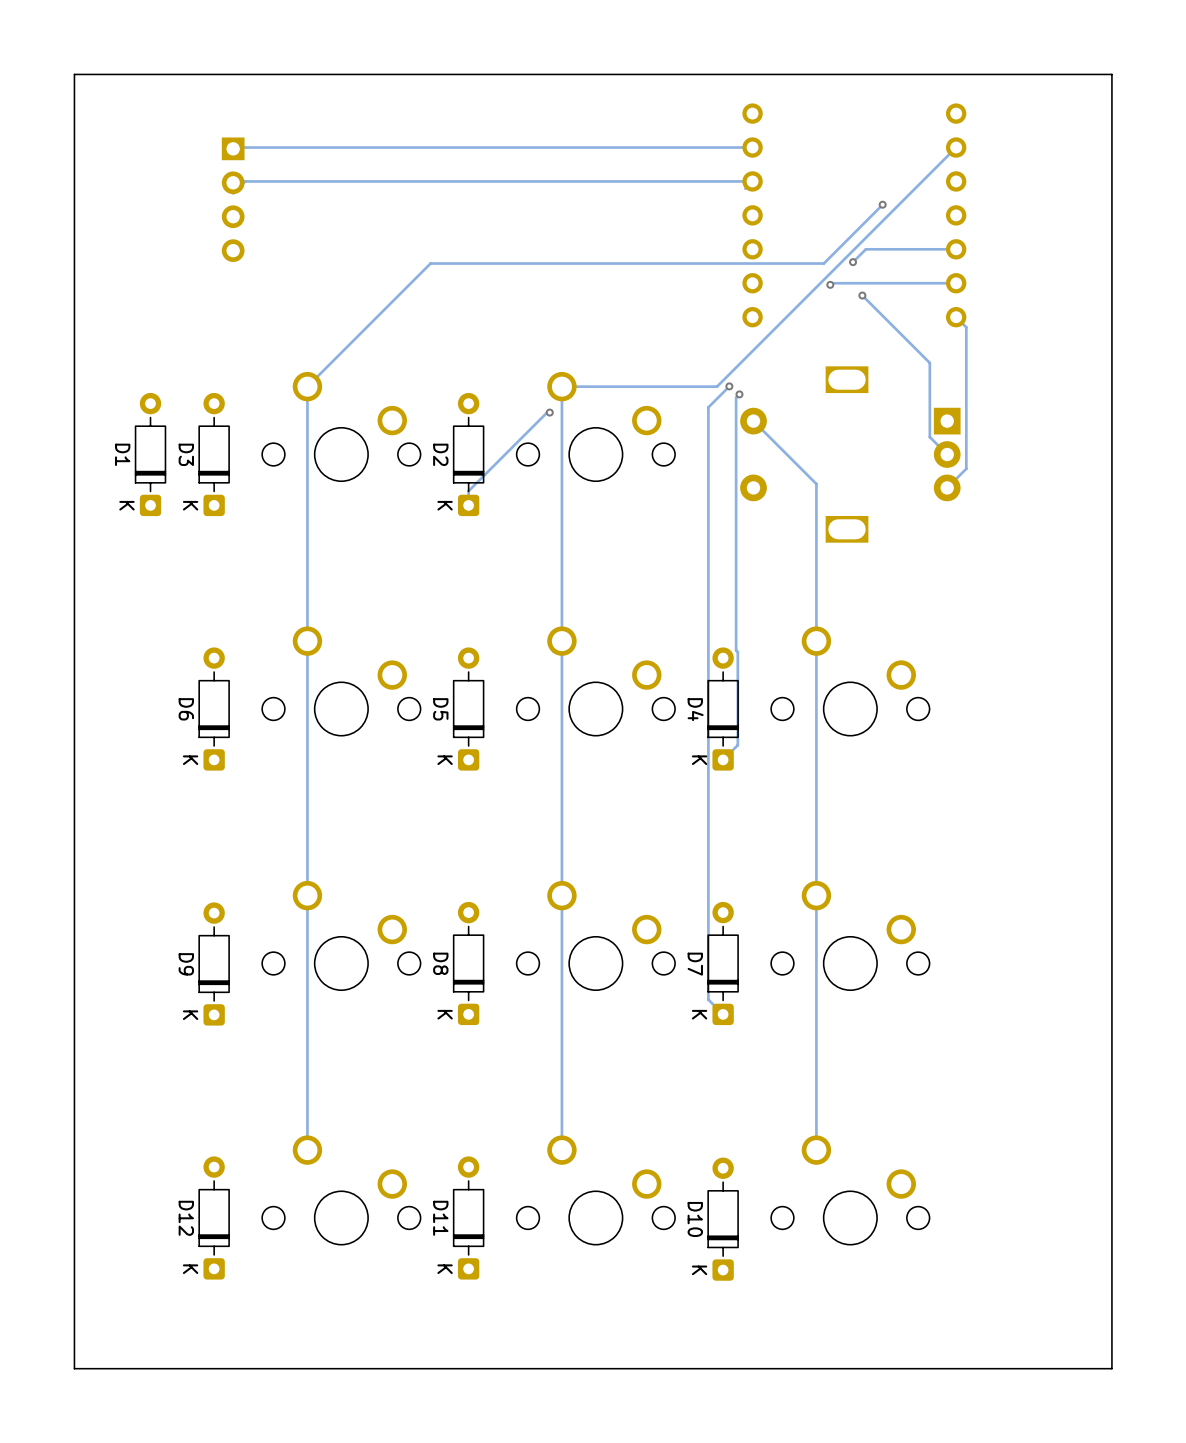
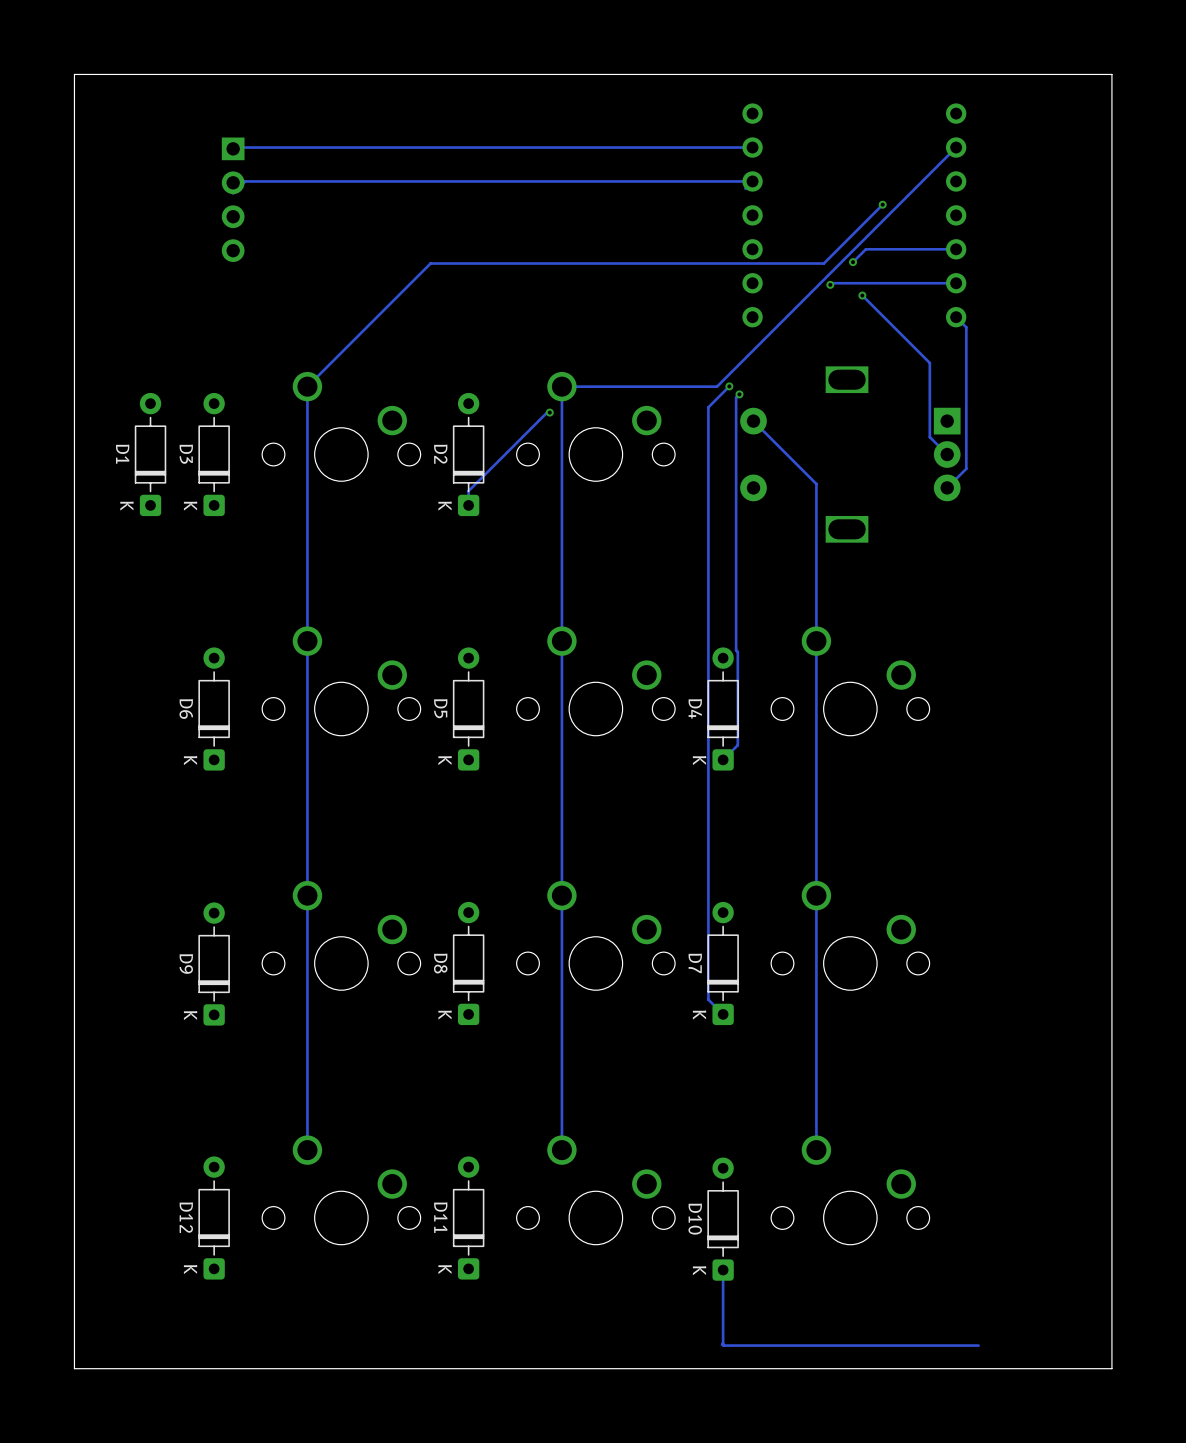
track: none -> (723, 1270) (723, 1345) (978, 1345)

